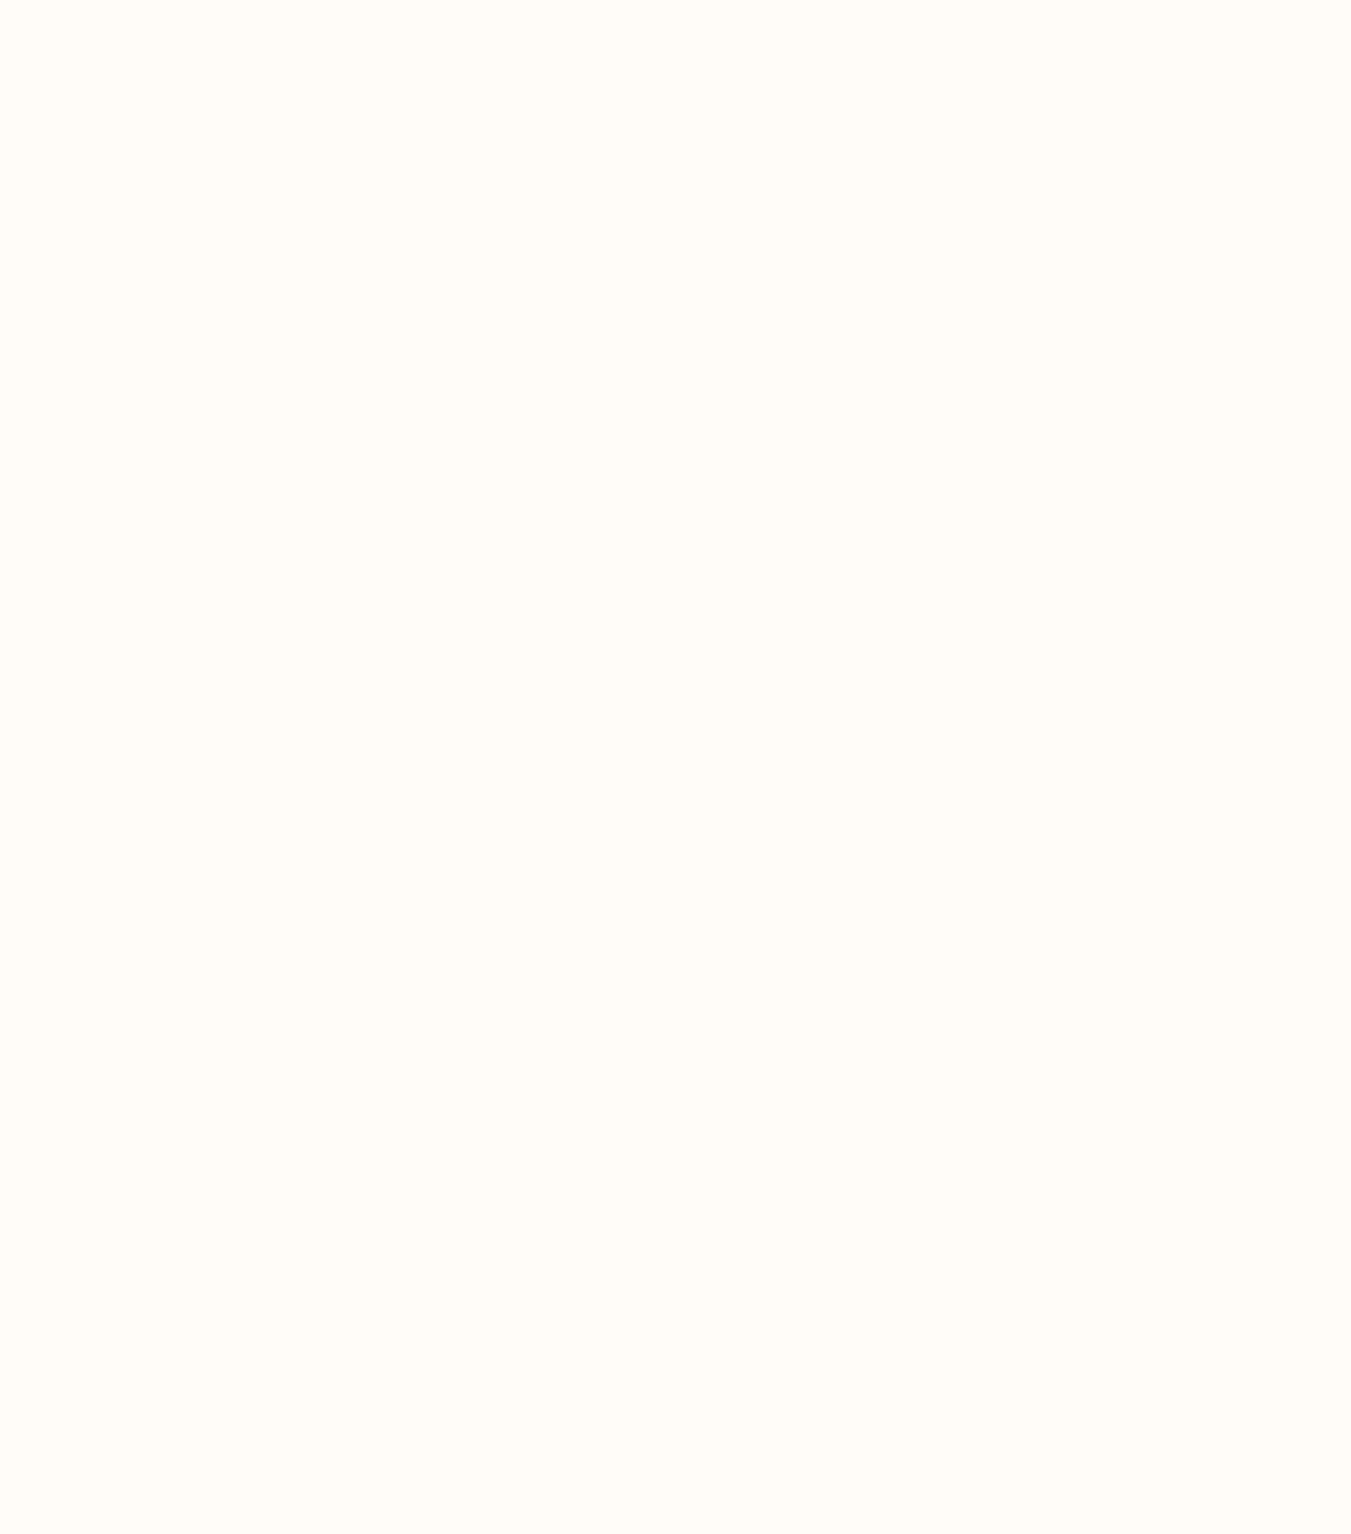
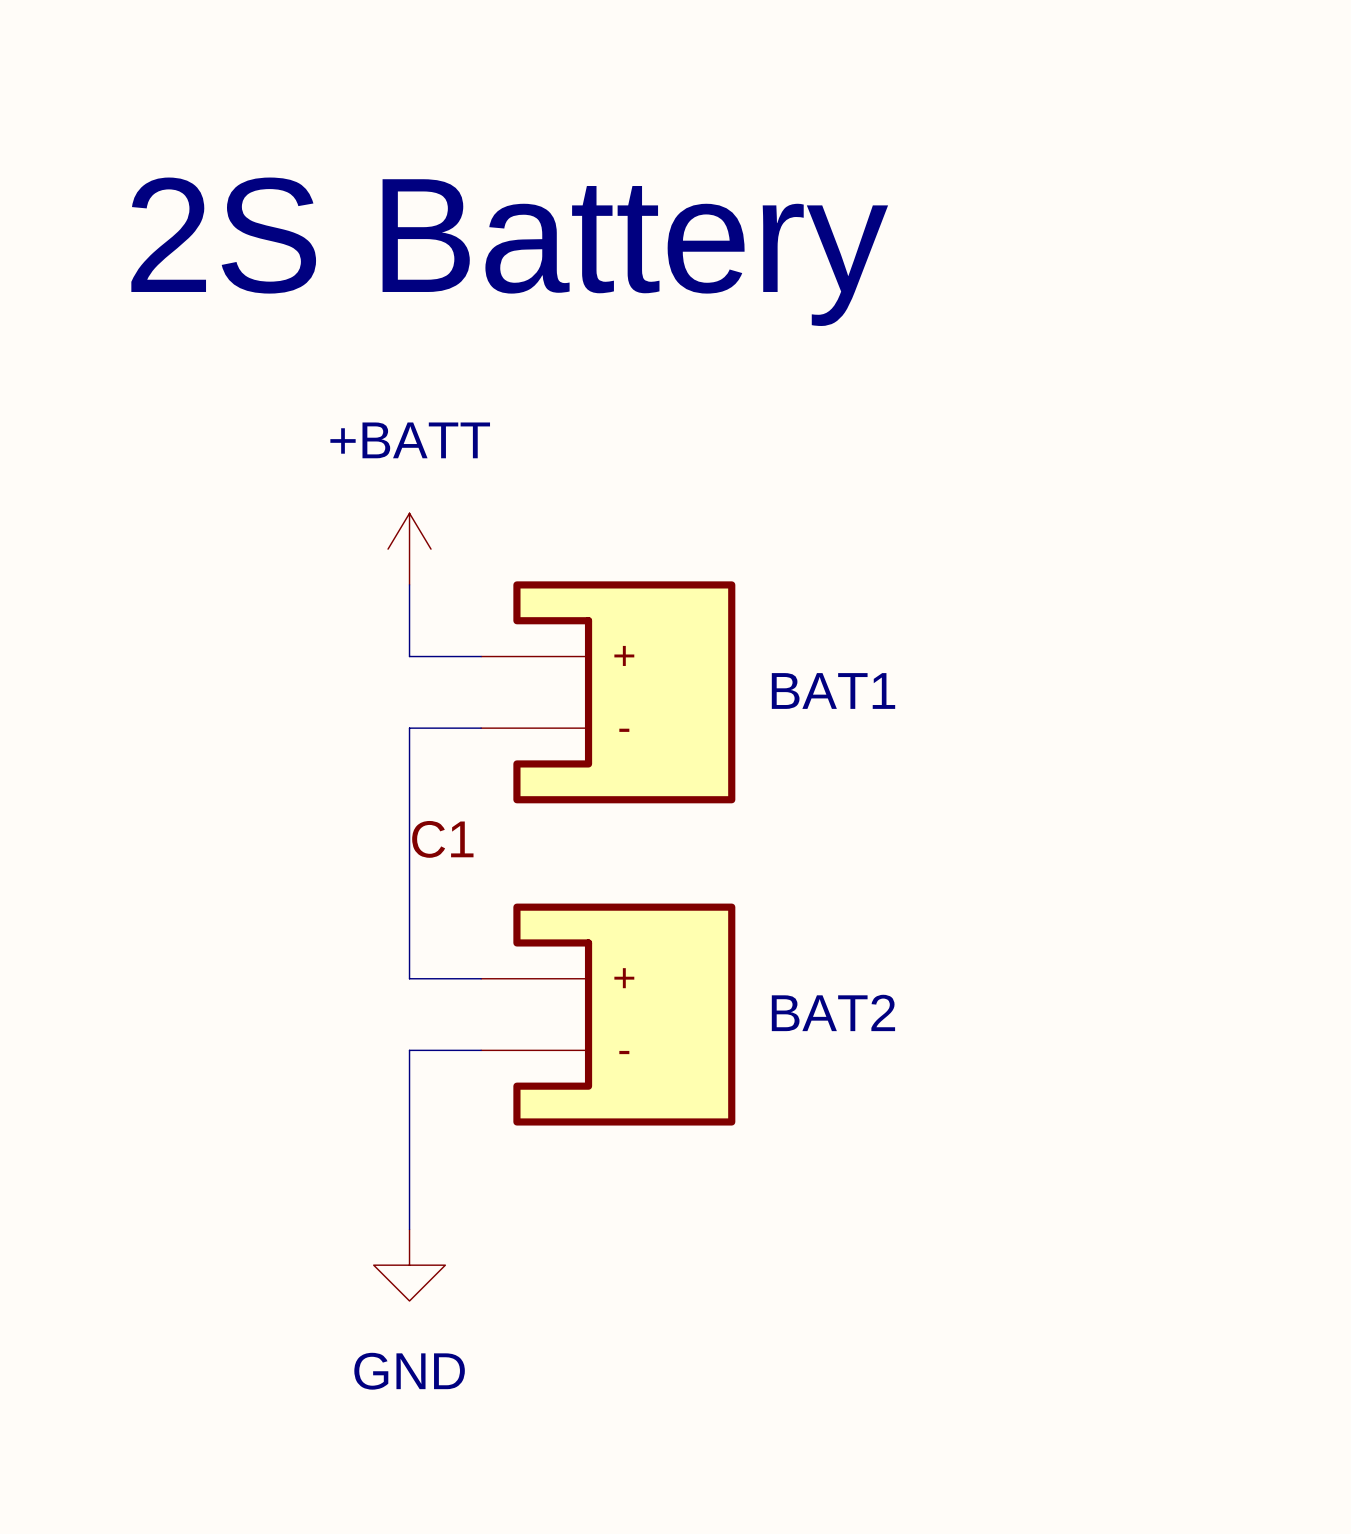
text: none -> 2S Battery (509, 251)
power symbol: none -> +BATT (409, 549)
wire: none -> (409, 584) (409, 656) (481, 656)
BAT1: none -> (608, 692)
wire: none -> (481, 728) (409, 728) (409, 978) (481, 978)
label: none -> C1 (442, 839)
BAT2: none -> (608, 1014)
wire: none -> (481, 1050) (409, 1050) (409, 1229)
power symbol: none -> GND (409, 1265)

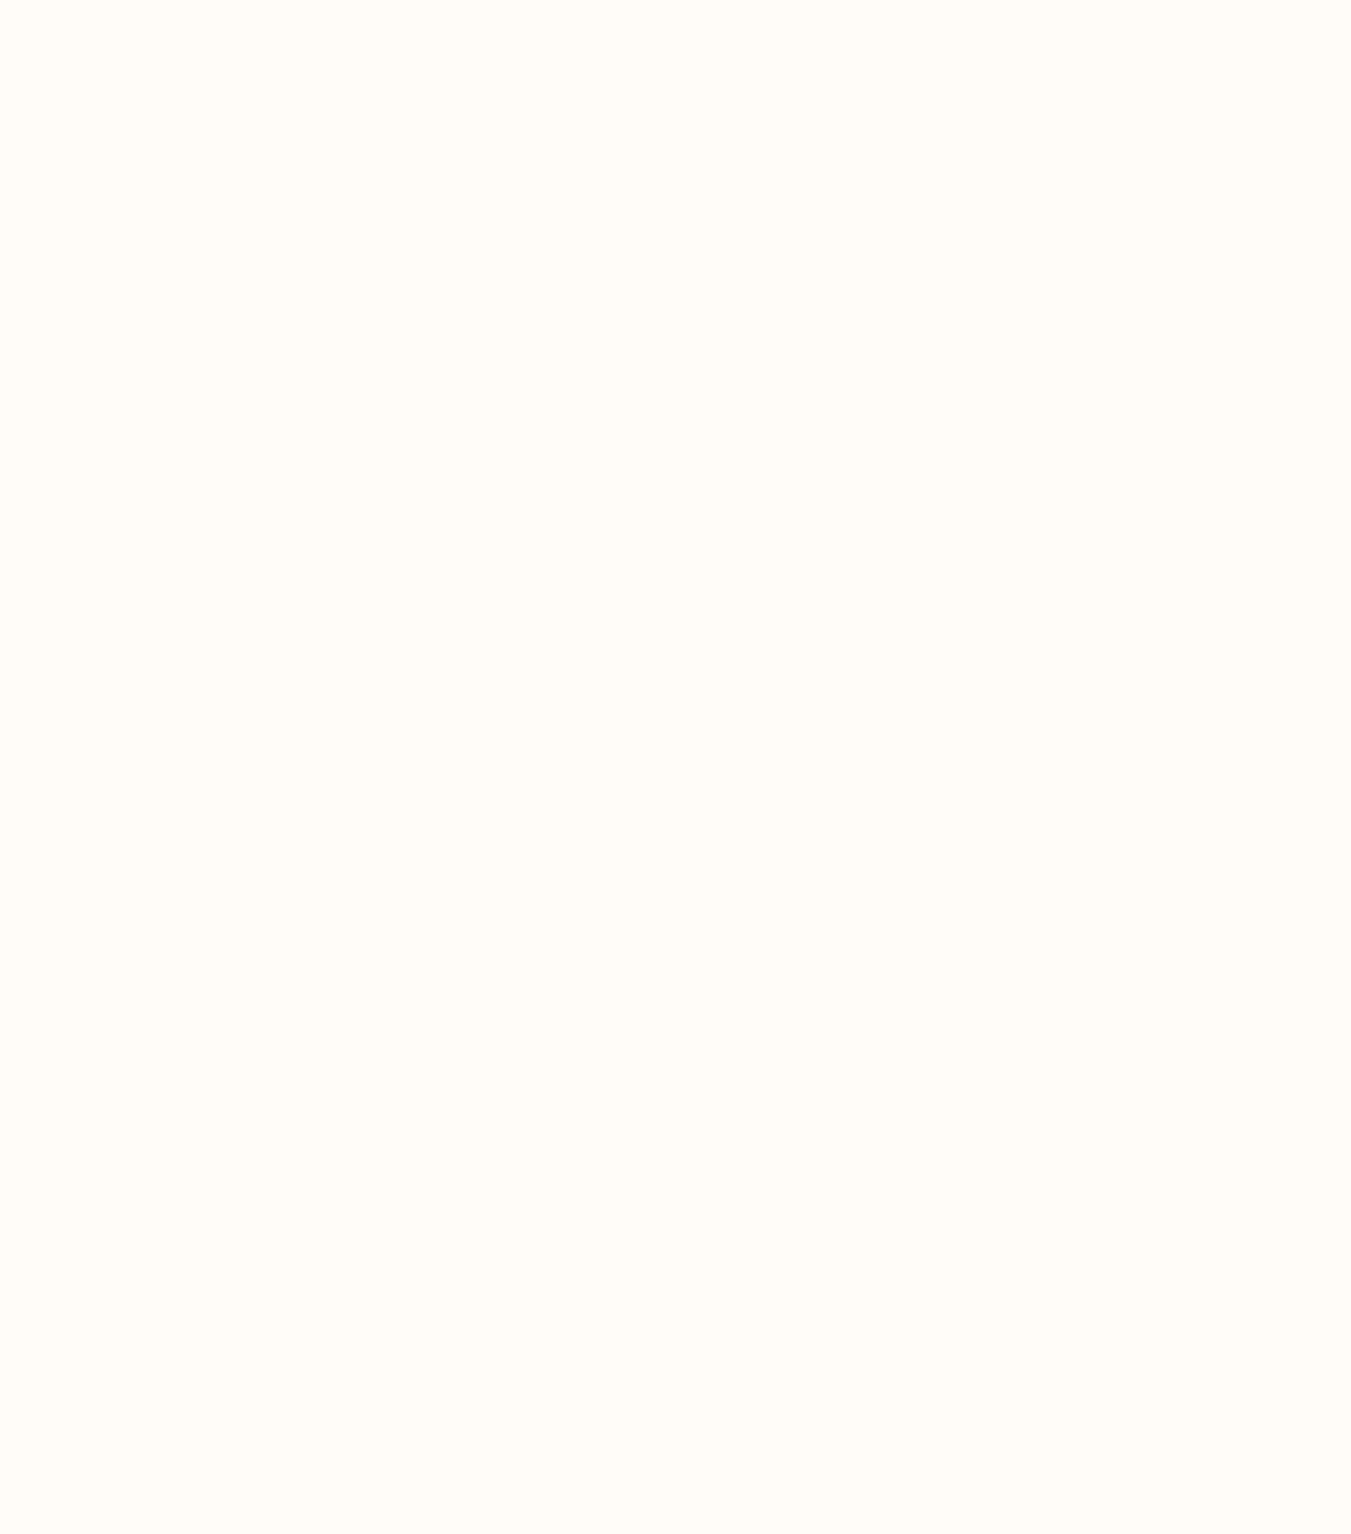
text: 2S Battery (509, 251) -> none
power symbol: +BATT (409, 549) -> none
wire: (409, 584) (409, 656) (481, 656) -> none
BAT1: (608, 692) -> none
wire: (481, 728) (409, 728) (409, 978) (481, 978) -> none
label: C1 (442, 839) -> none
BAT2: (608, 1014) -> none
wire: (481, 1050) (409, 1050) (409, 1229) -> none
power symbol: GND (409, 1265) -> none

